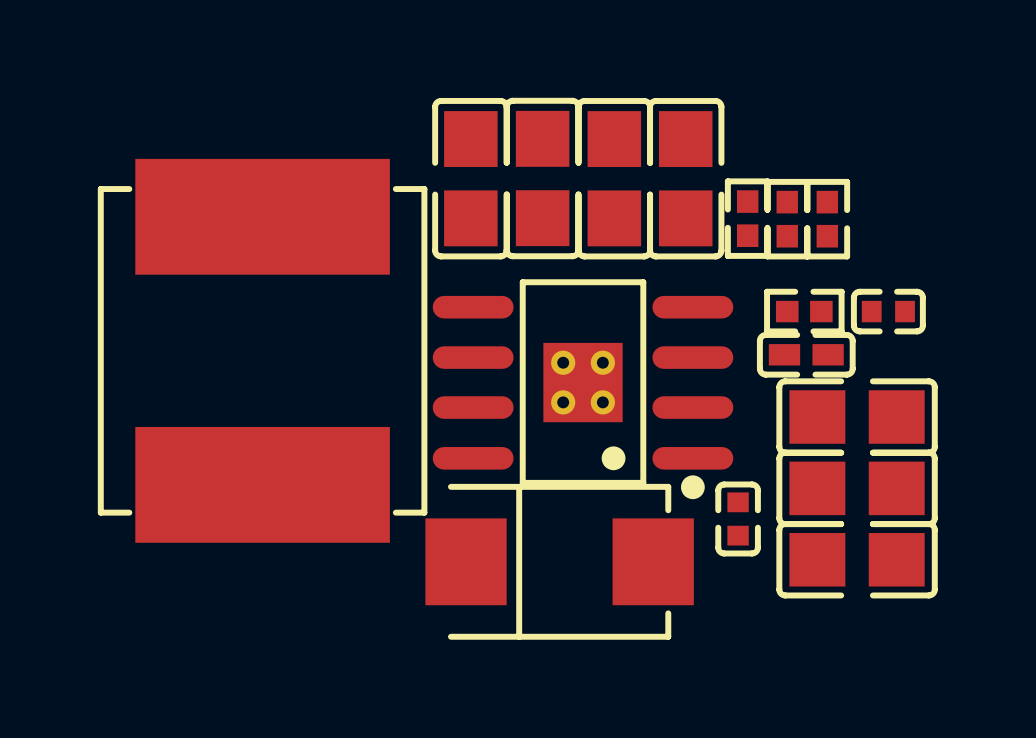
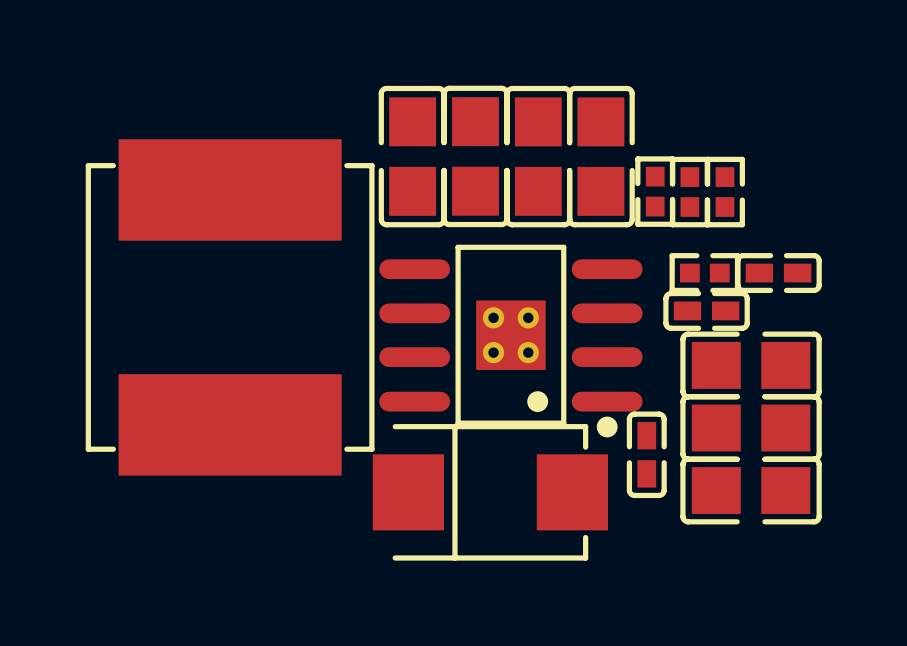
part footprint: [850, 288, 926, 335] -> [735, 253, 822, 294]
part footprint: [715, 481, 761, 557] -> [626, 411, 667, 499]

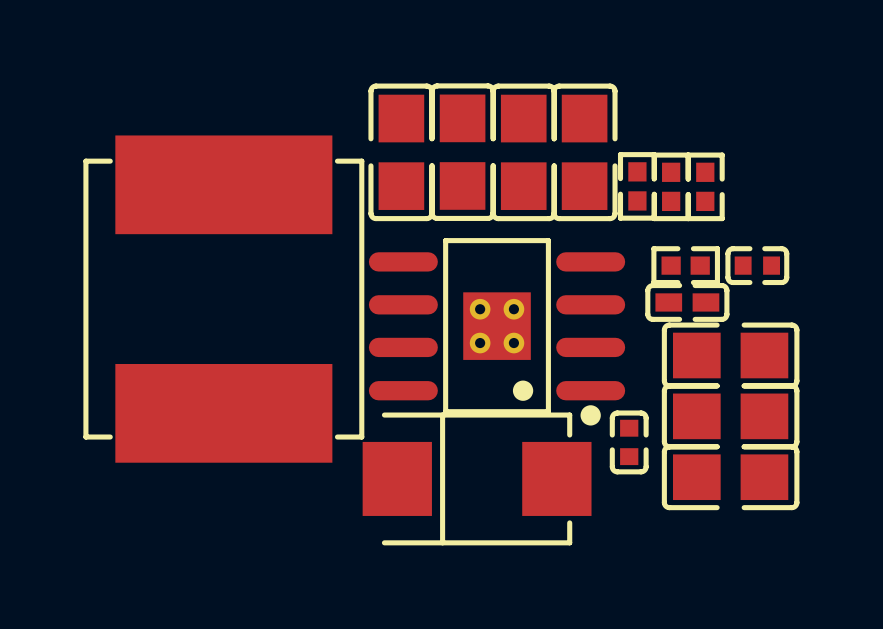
part footprint: [735, 253, 822, 294] -> [725, 246, 790, 286]
part footprint: [626, 411, 667, 499] -> [609, 410, 649, 475]

